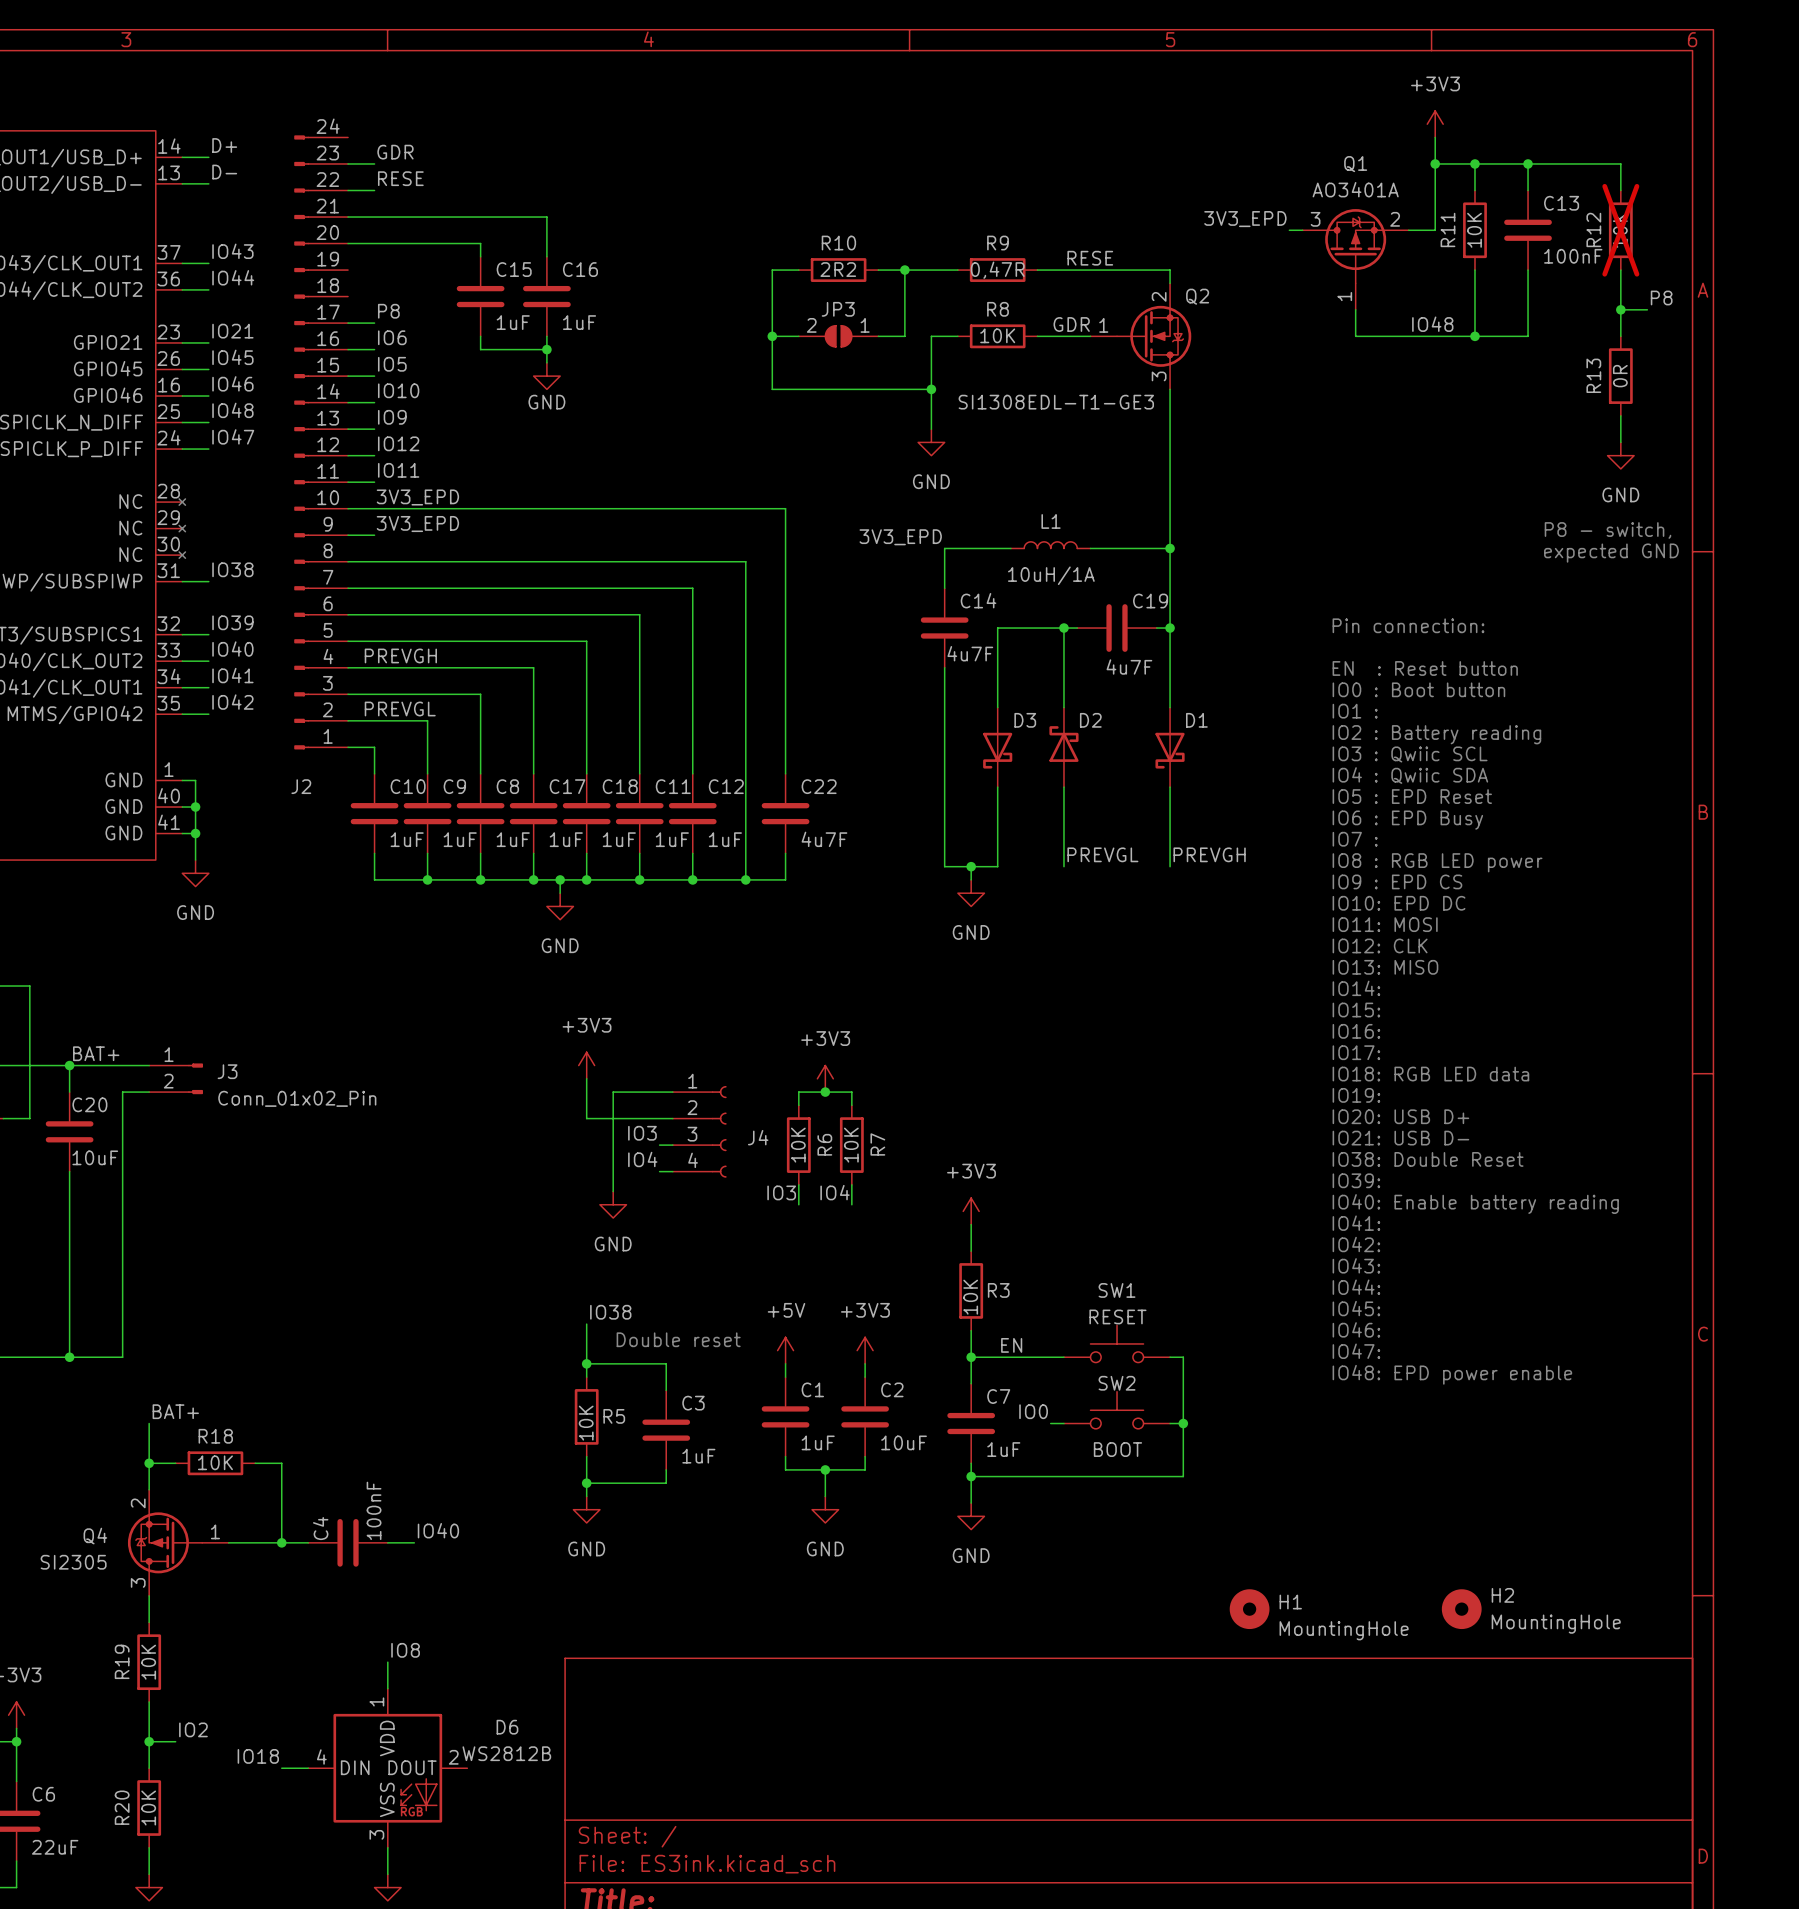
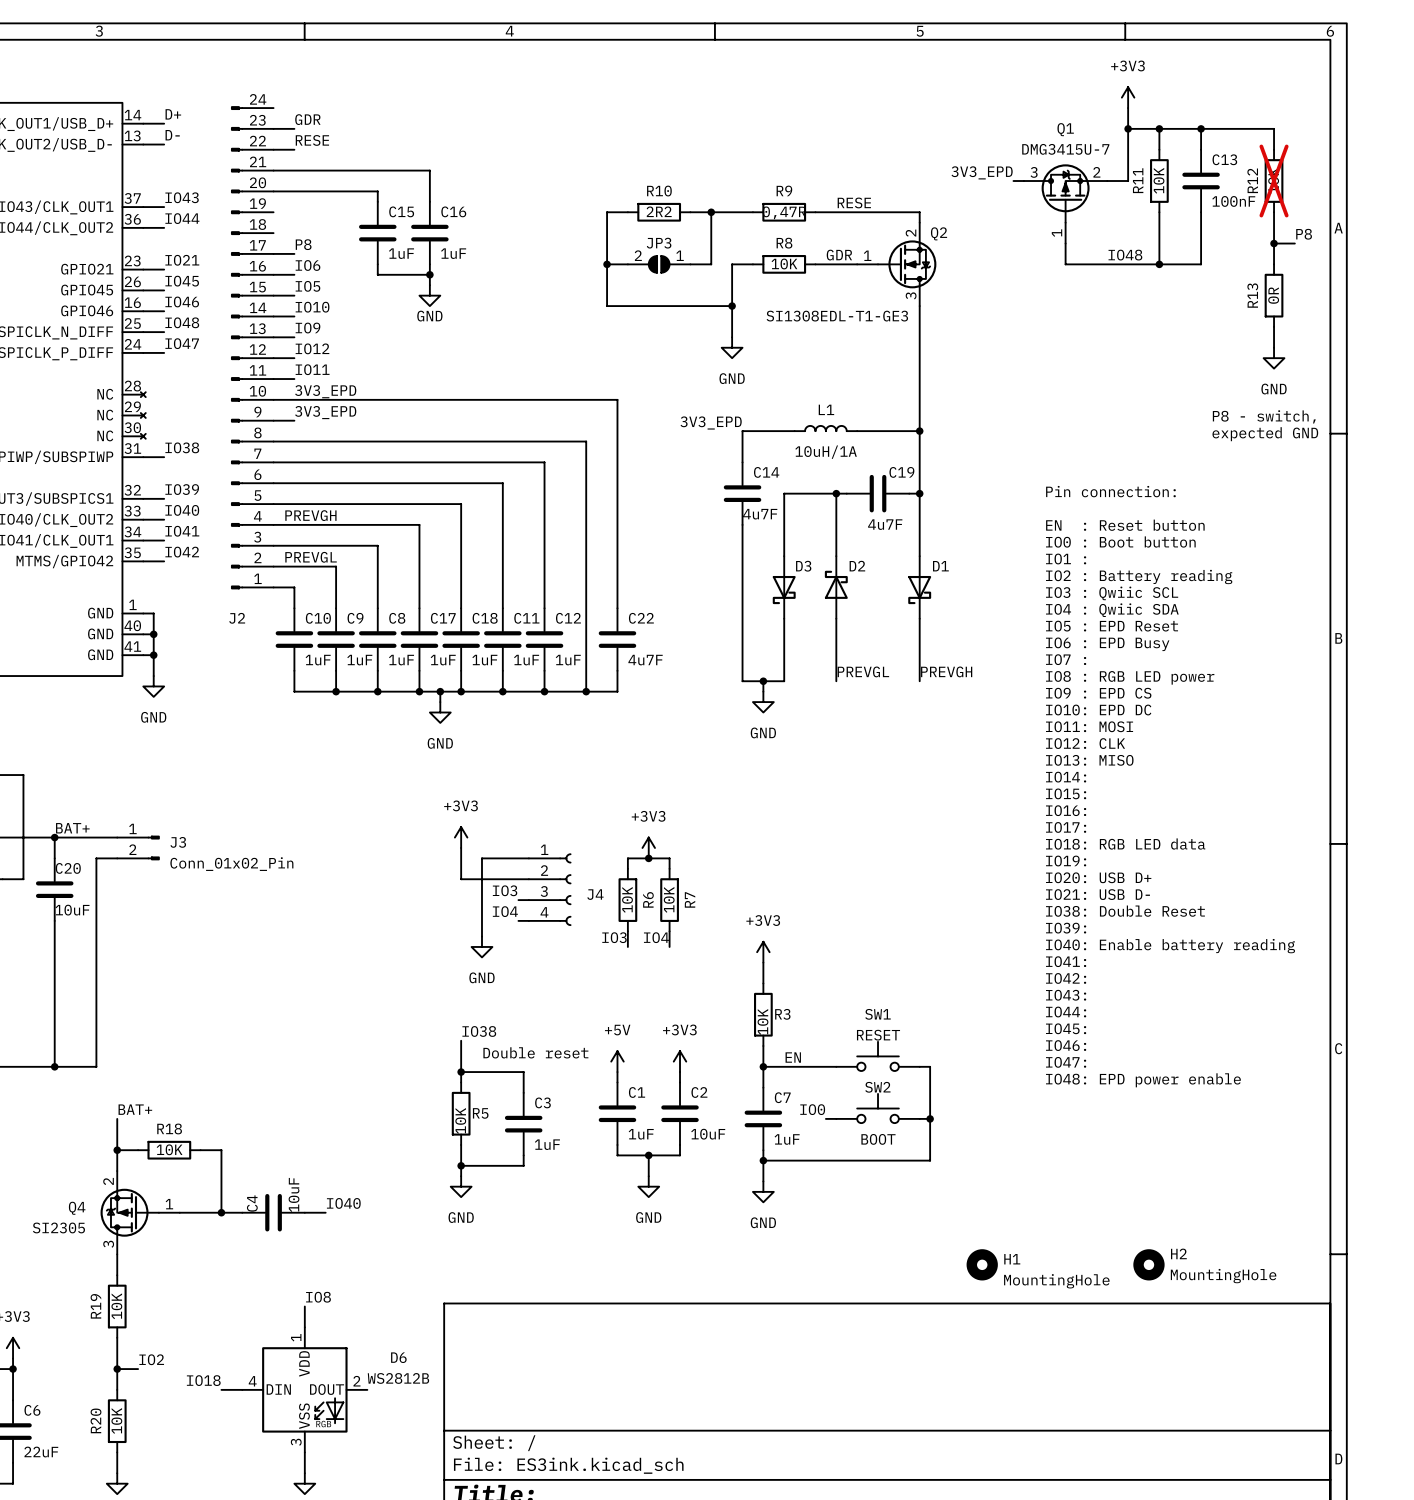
Q1 value: AO3401A (1355, 189) -> DMG3415U-7 (1065, 149)
C4 value: 100nF (374, 1510) -> 10uF (294, 1194)

